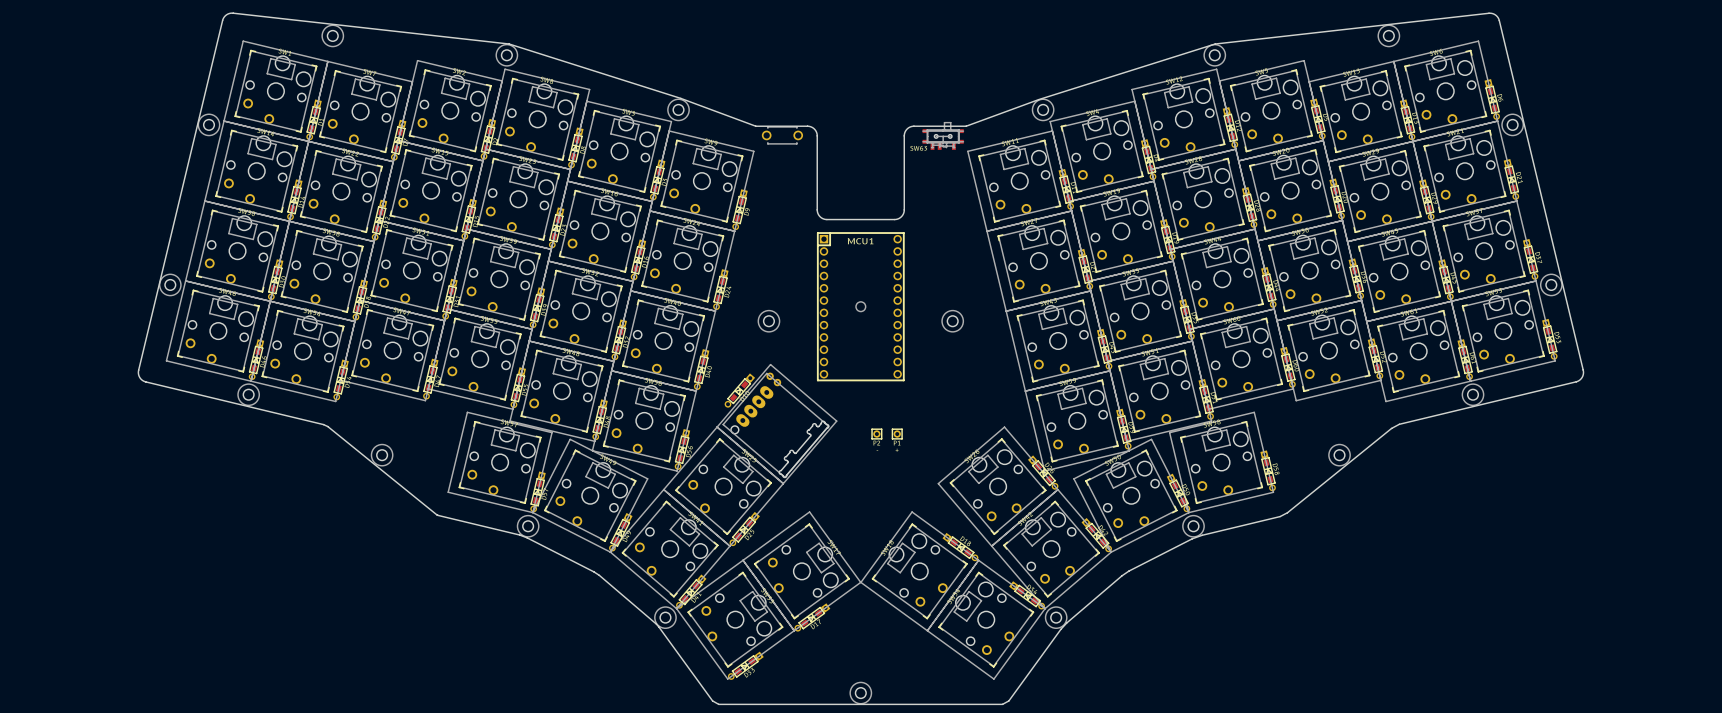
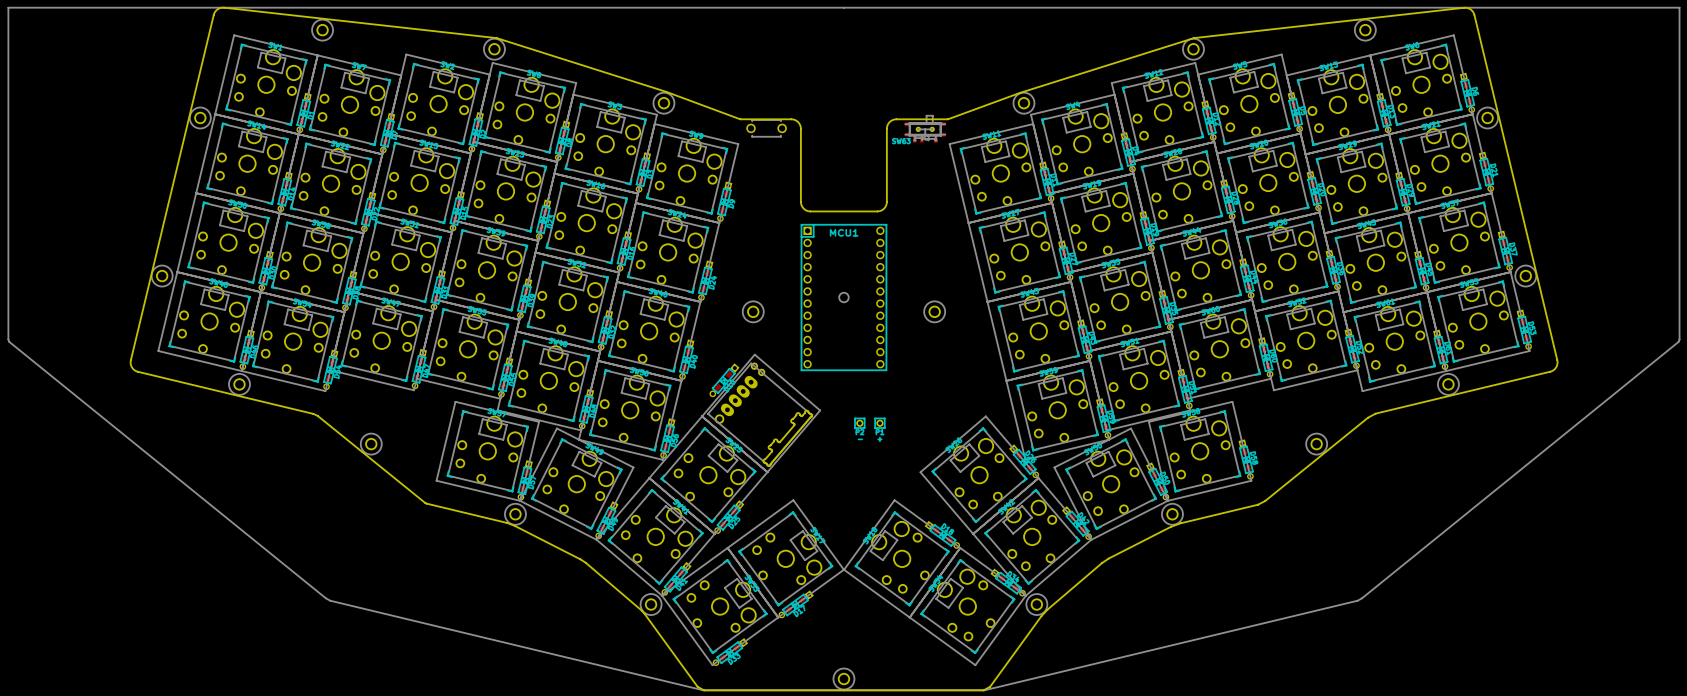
line: none -> (8, 7) (1679, 7) (1679, 339) (1357, 600) (983, 690) (704, 690) (330, 600) (9, 341) (8, 7)

